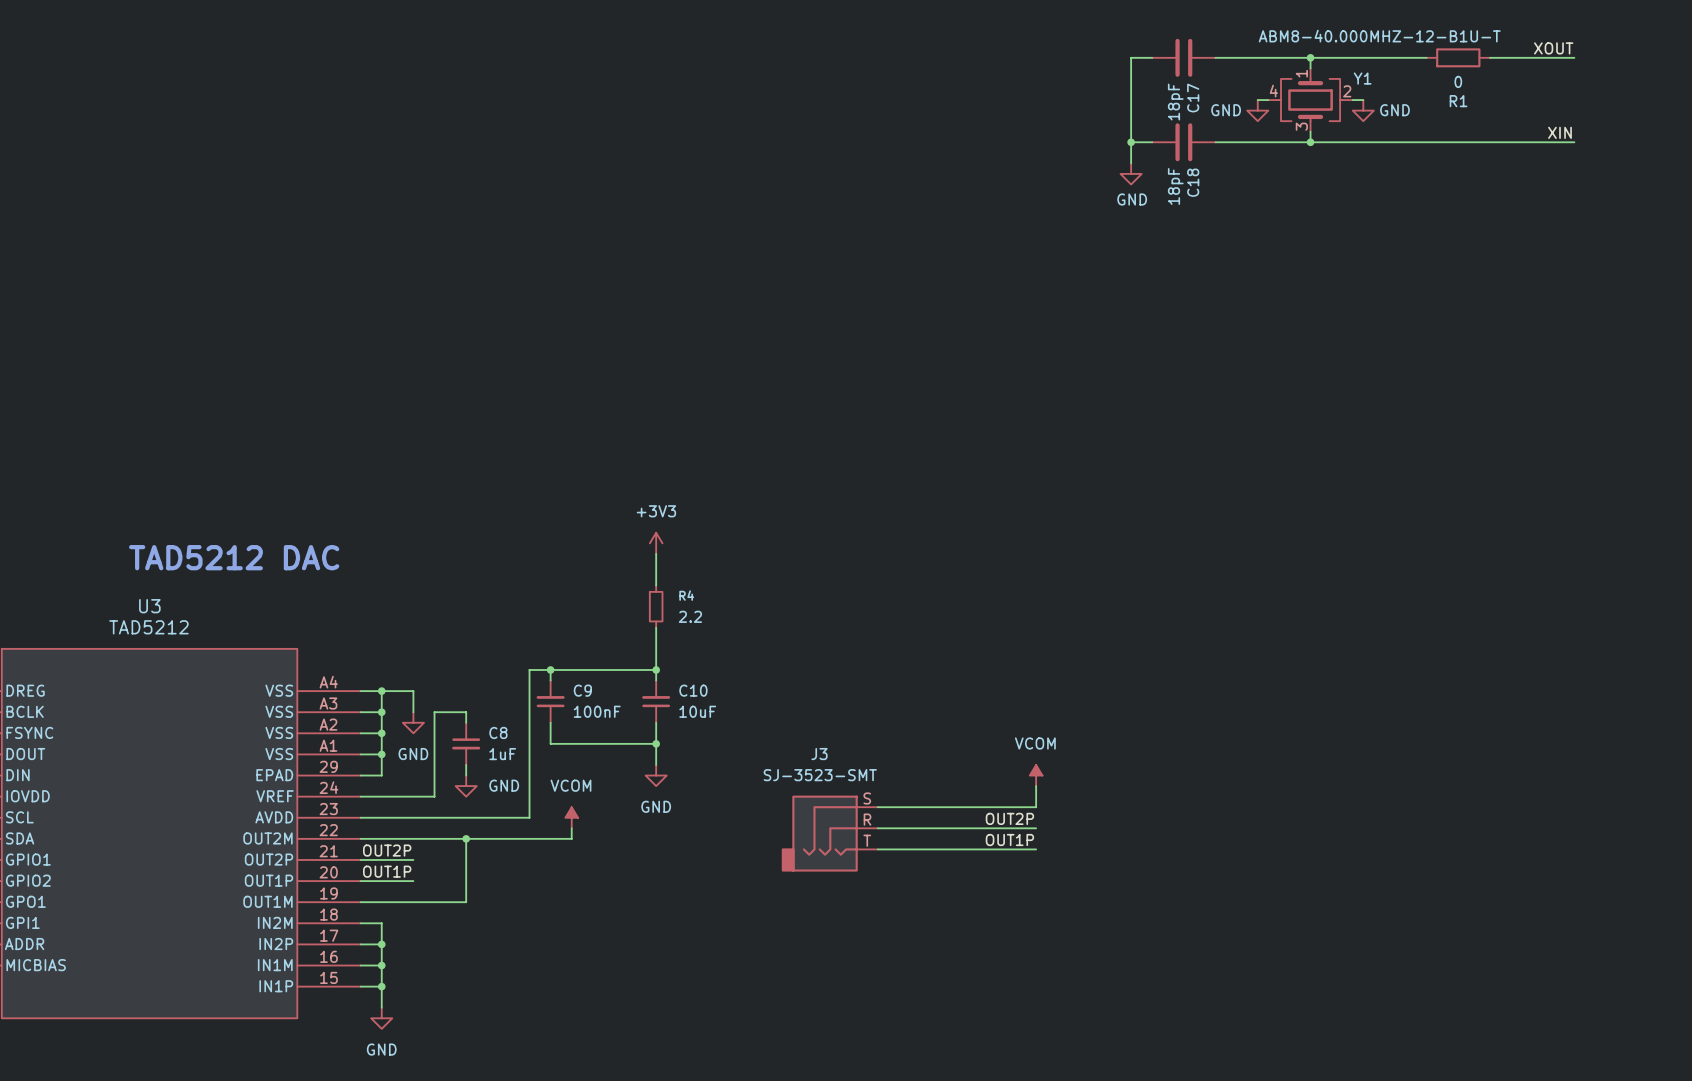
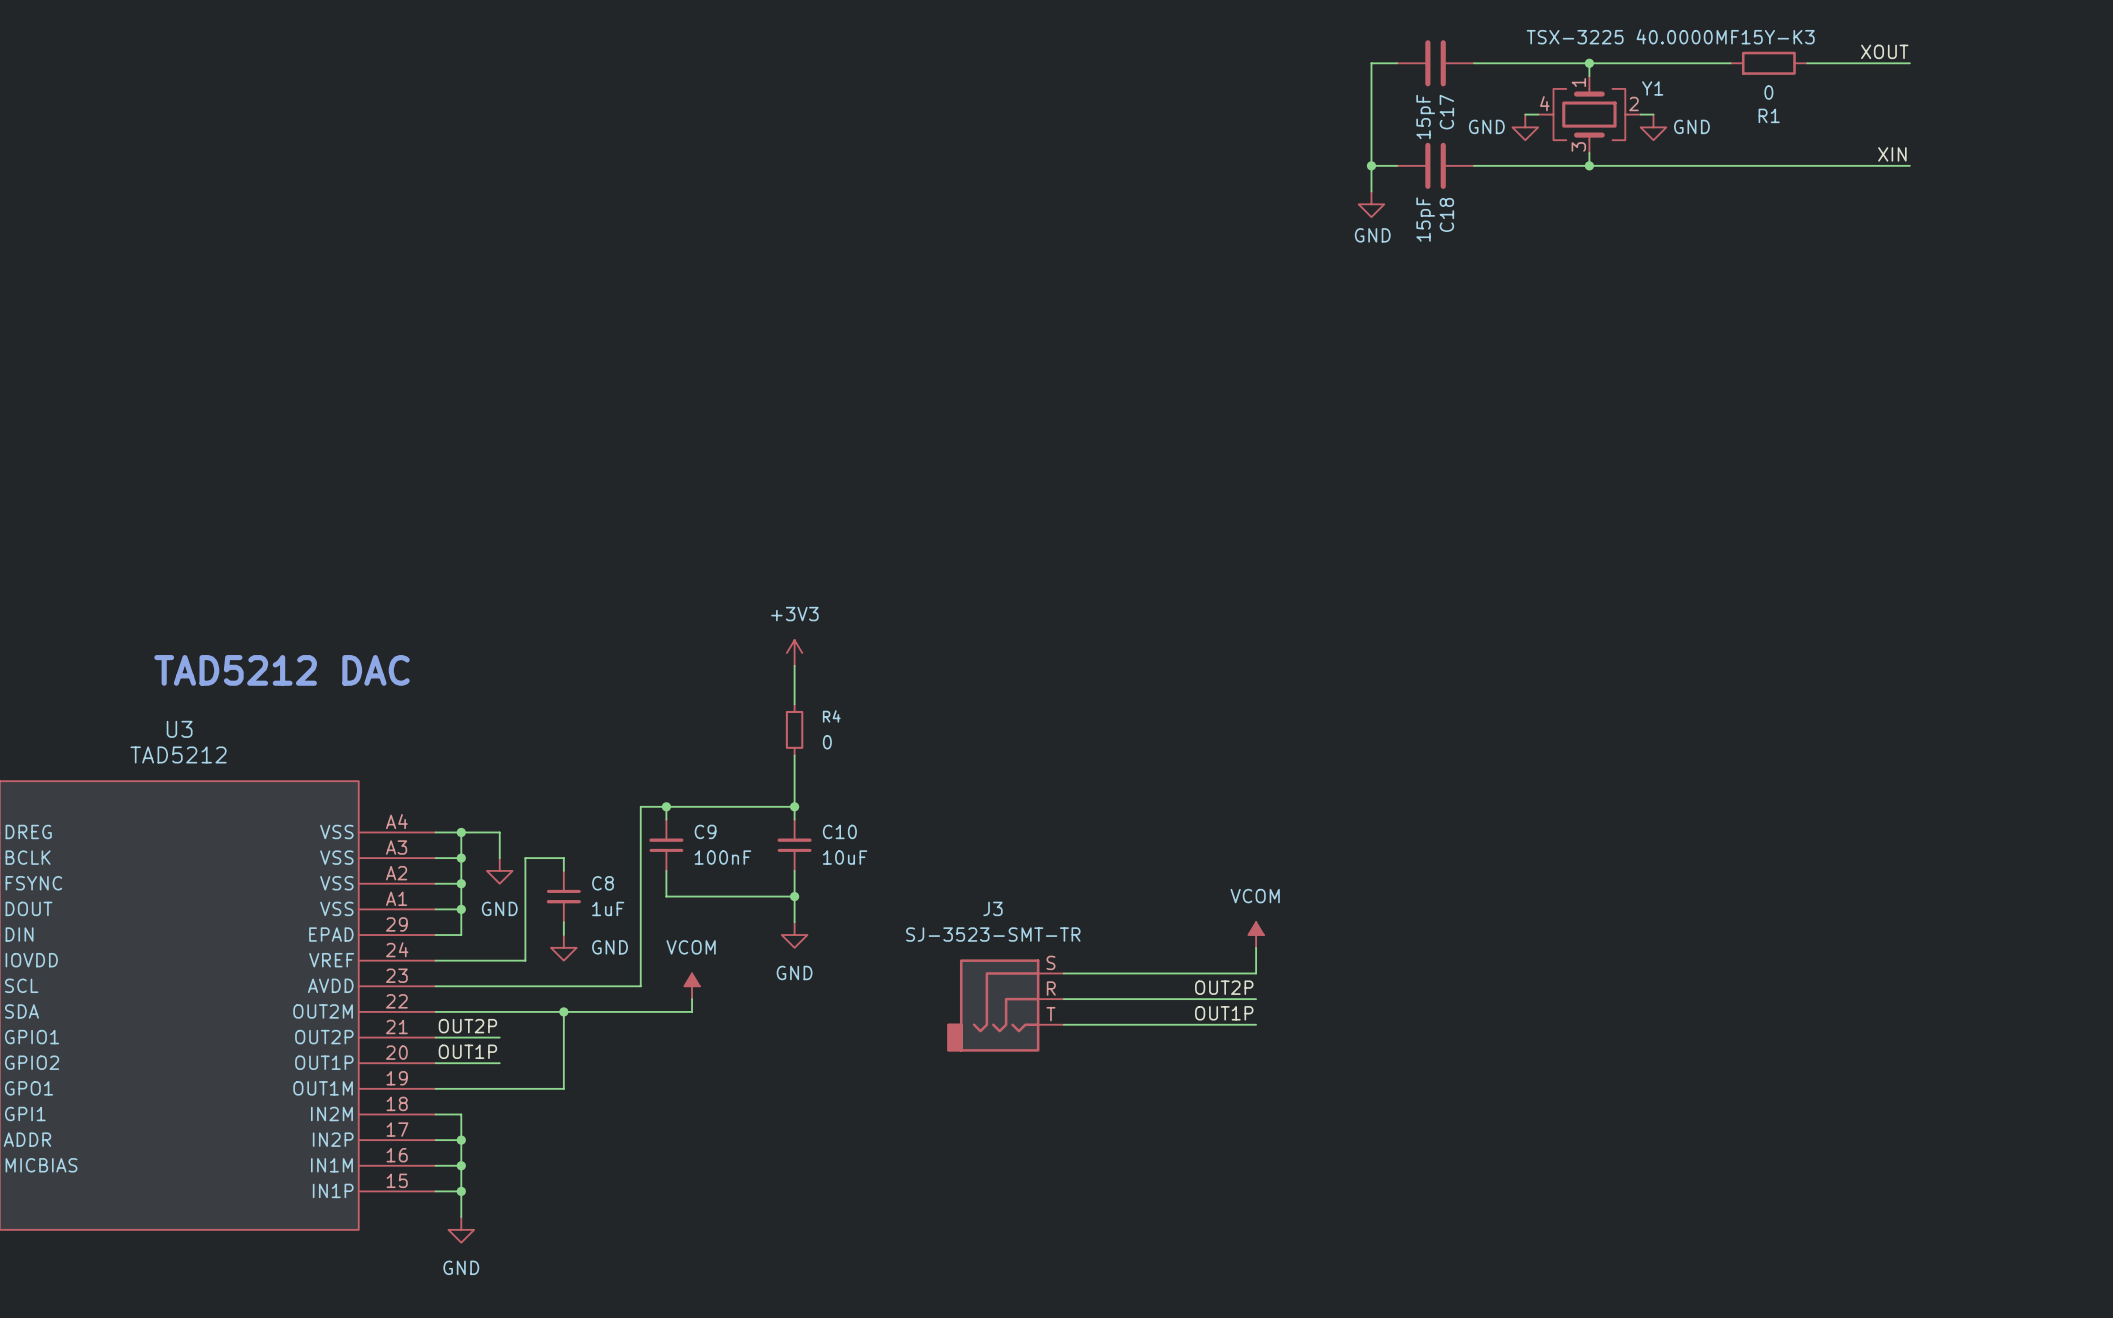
Y1 value: ABM8-40.000MHZ-12-B1U-T (1379, 36) -> TSX-3225 40.0000MF15Y-K3 (1670, 36)
C17 value: 18pF (1175, 102) -> 15pF (1425, 116)
C18 value: 18pF (1175, 186) -> 15pF (1425, 219)
R4 value: 2.2 (690, 616) -> 0 (827, 742)
J3 value: SJ-3523-SMT (820, 775) -> SJ-3523-SMT-TR (993, 934)

